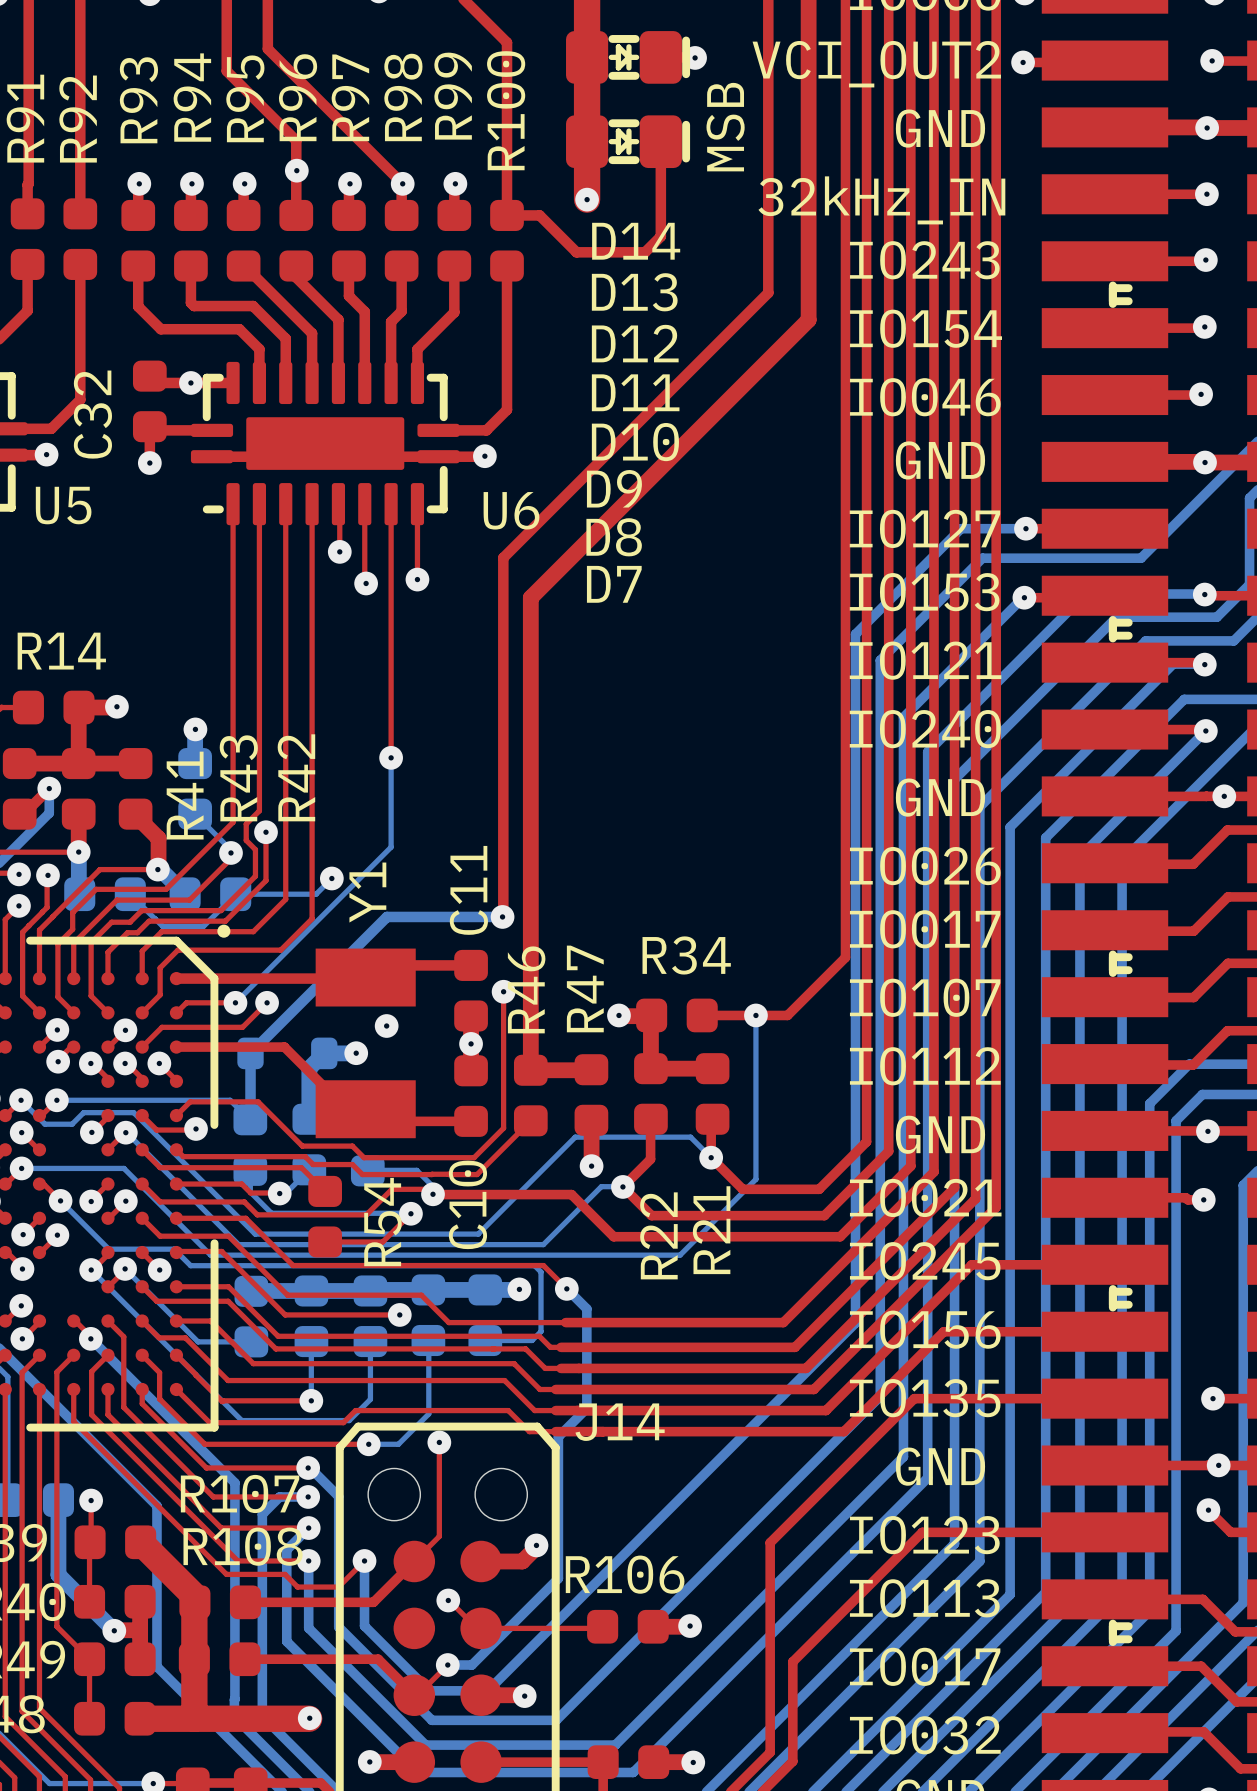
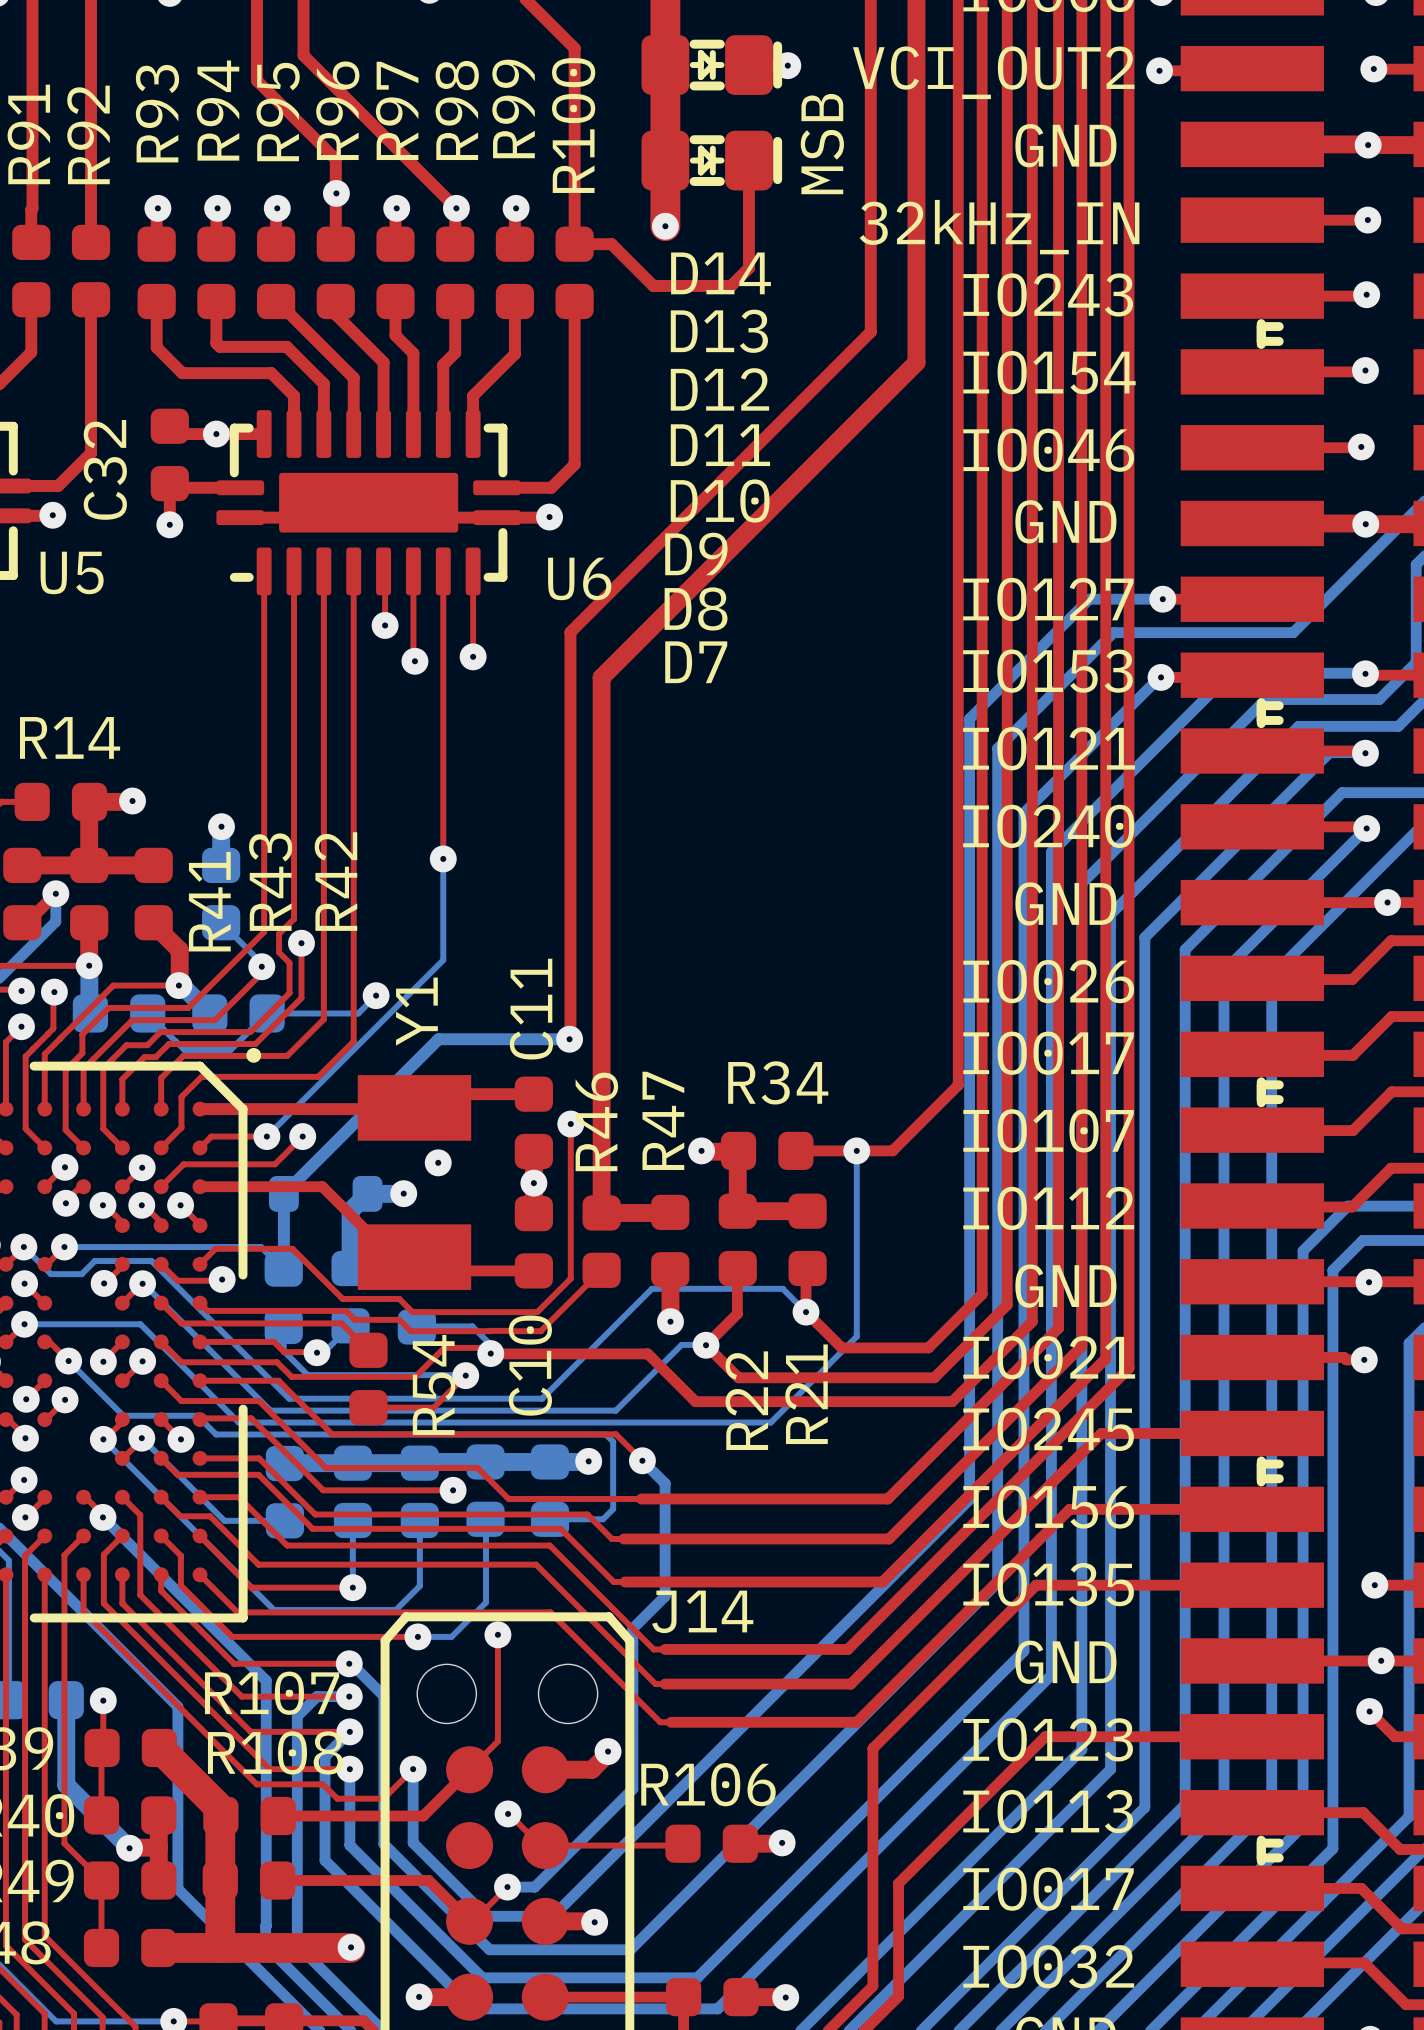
top track: (518, 1336) (539, 1336) (550, 1347) (794, 1347) -> (587, 1514) (611, 1538) (889, 1538) (900, 1527)
top track: (494, 1348) (525, 1348) (545, 1368) (578, 1368) -> (560, 1528) (613, 1581) (623, 1580)
top track: (485, 1363) (514, 1363) (539, 1389) (813, 1389) -> (549, 1545) (653, 1649) (847, 1649) (922, 1574)
top track: (561, 1368) (805, 1368) -> (625, 1581) (882, 1581) (913, 1550)
top track: (473, 1380) (504, 1380) (534, 1410) (826, 1410) -> (536, 1564) (655, 1684) (850, 1684) (936, 1598)
top track: (343, 1422) (355, 1410) (508, 1410) (529, 1431) (843, 1431) -> (389, 1612) (550, 1612) (660, 1722) (856, 1722) (956, 1622)

